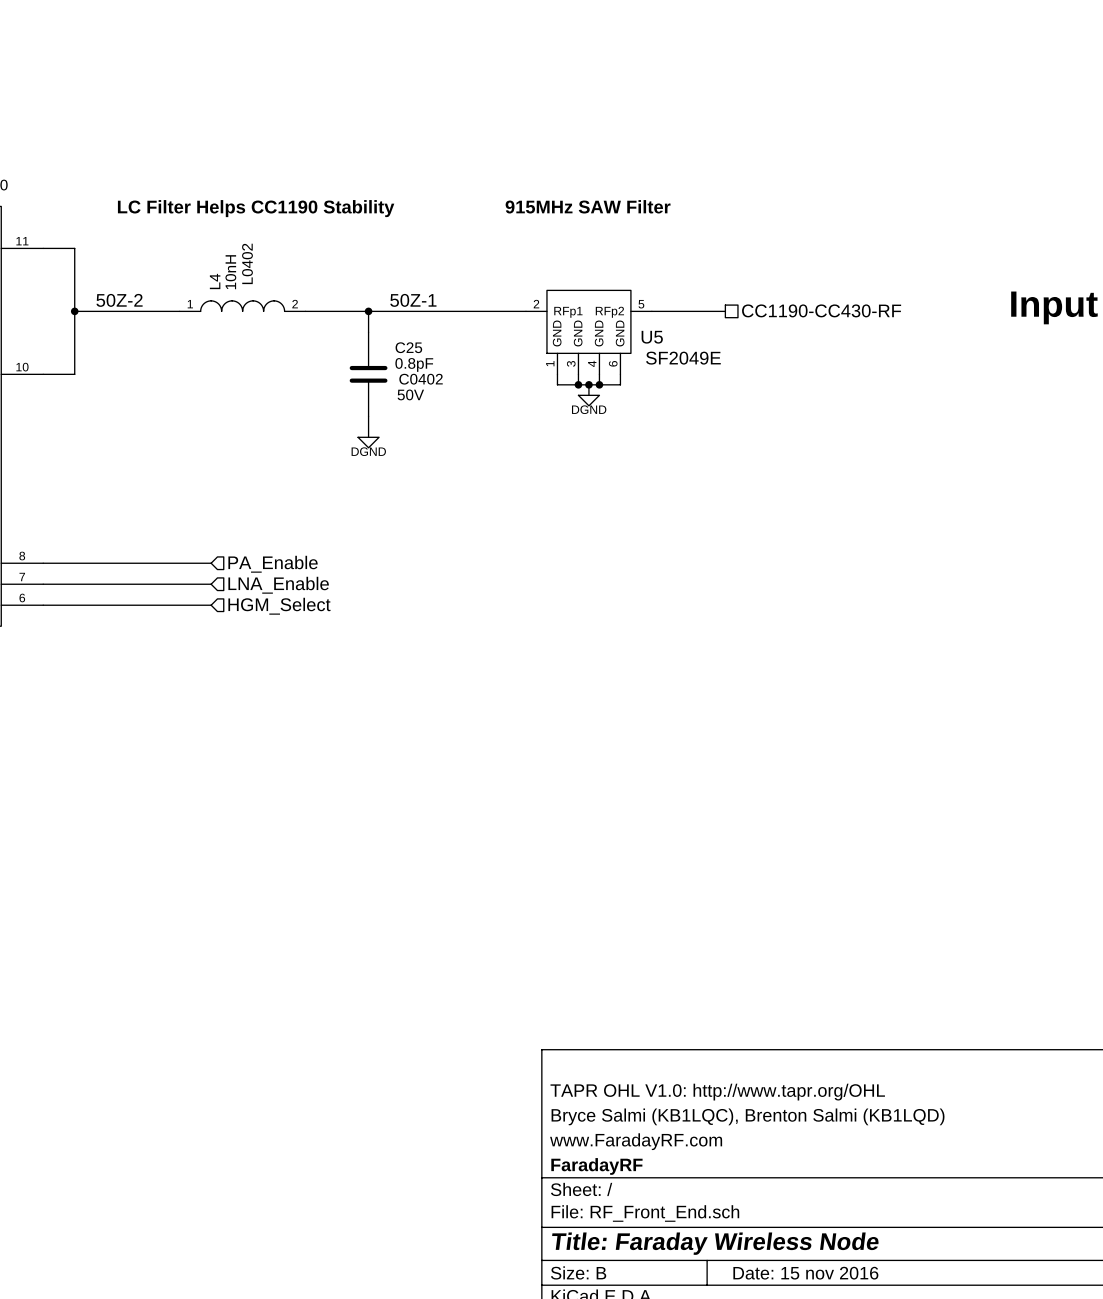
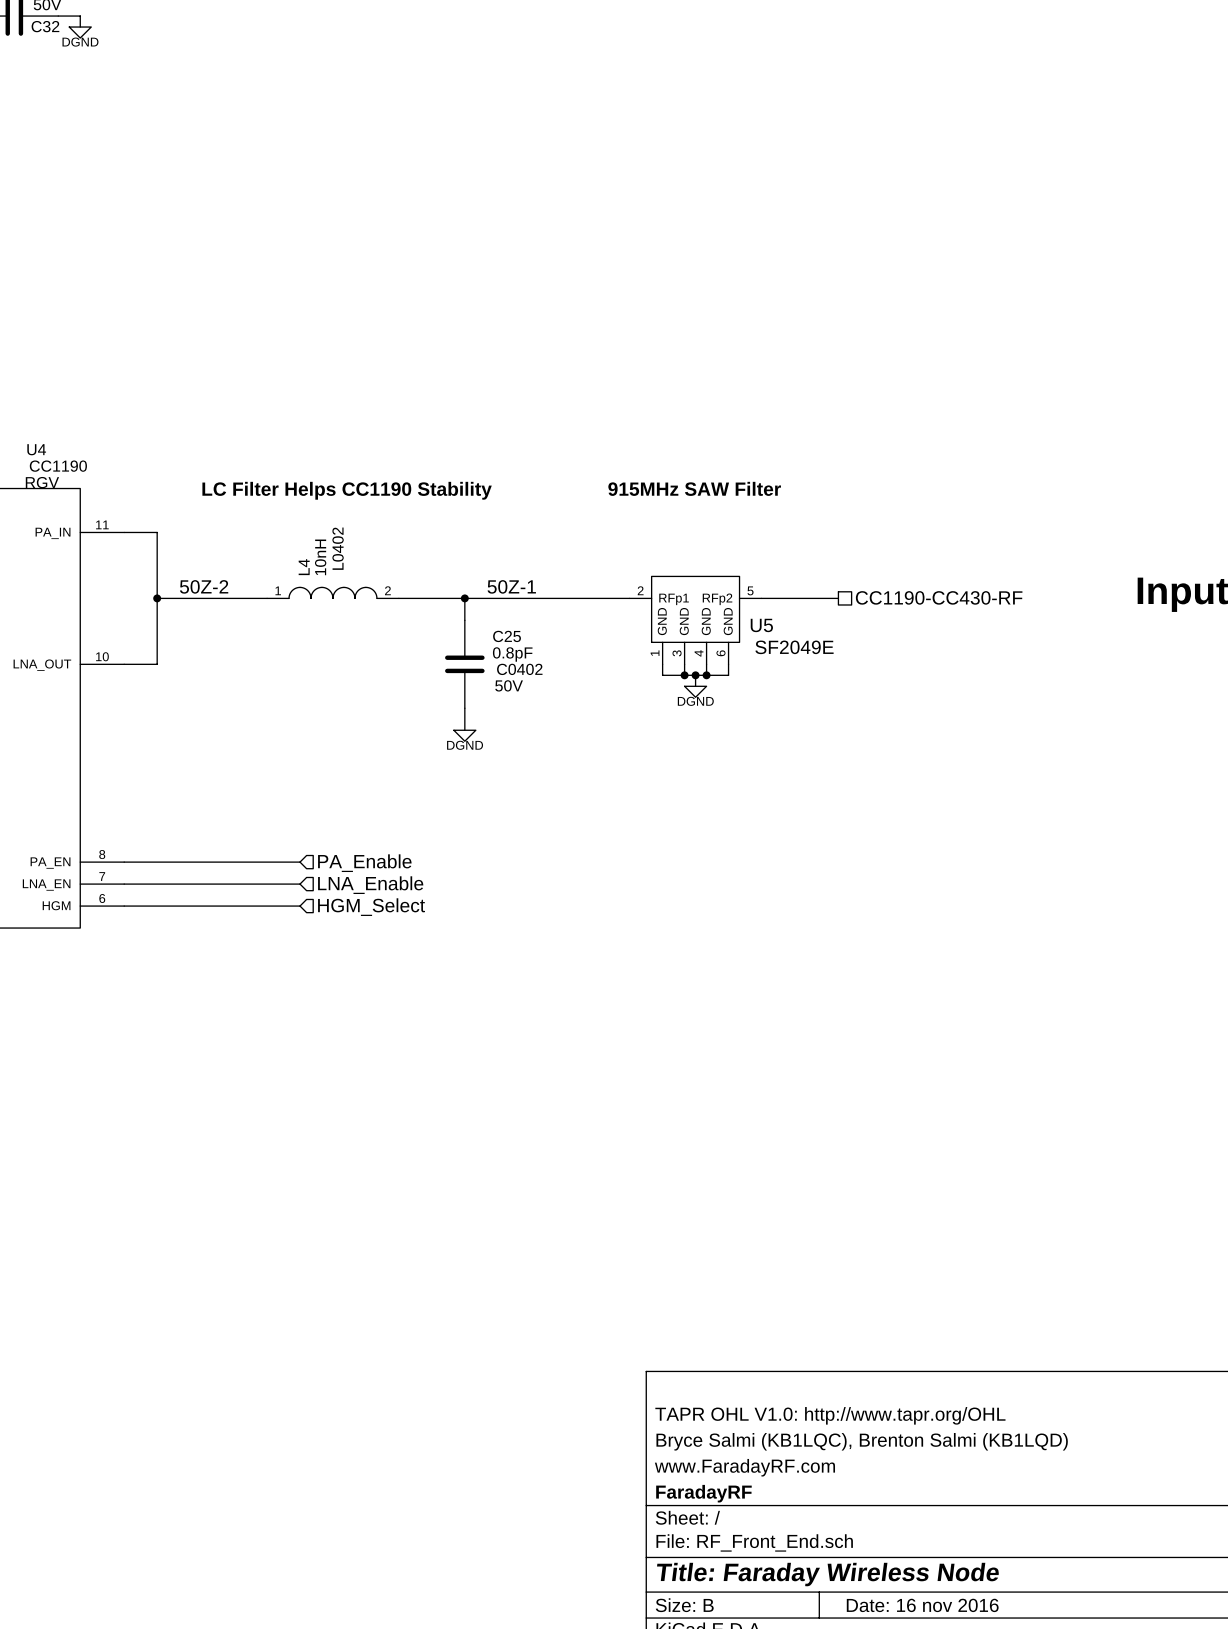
title block: Date: 15 nov 2016 (805, 1273) -> Date: 16 nov 2016 (922, 1605)

